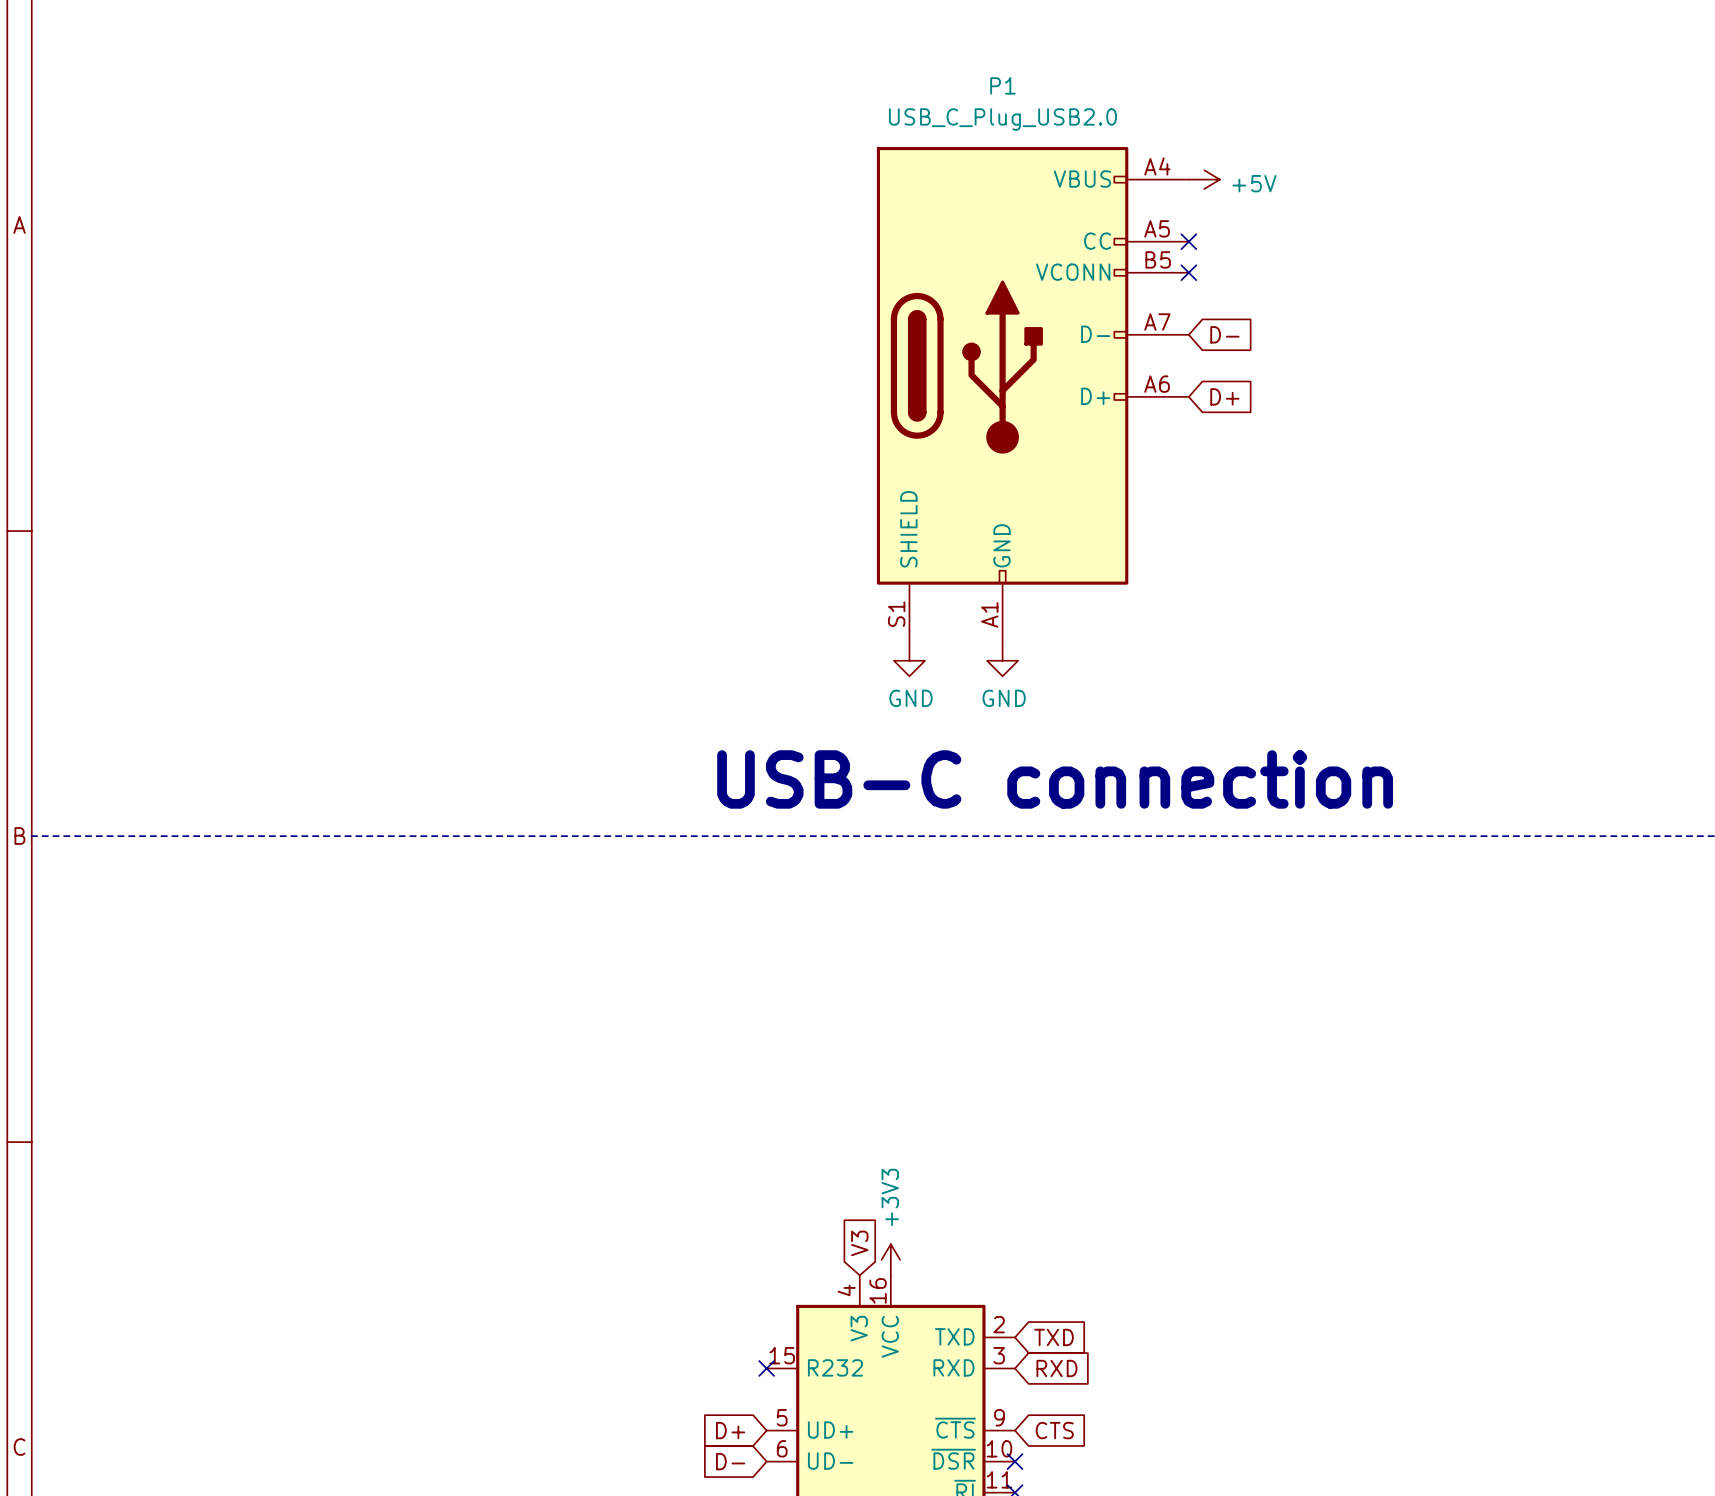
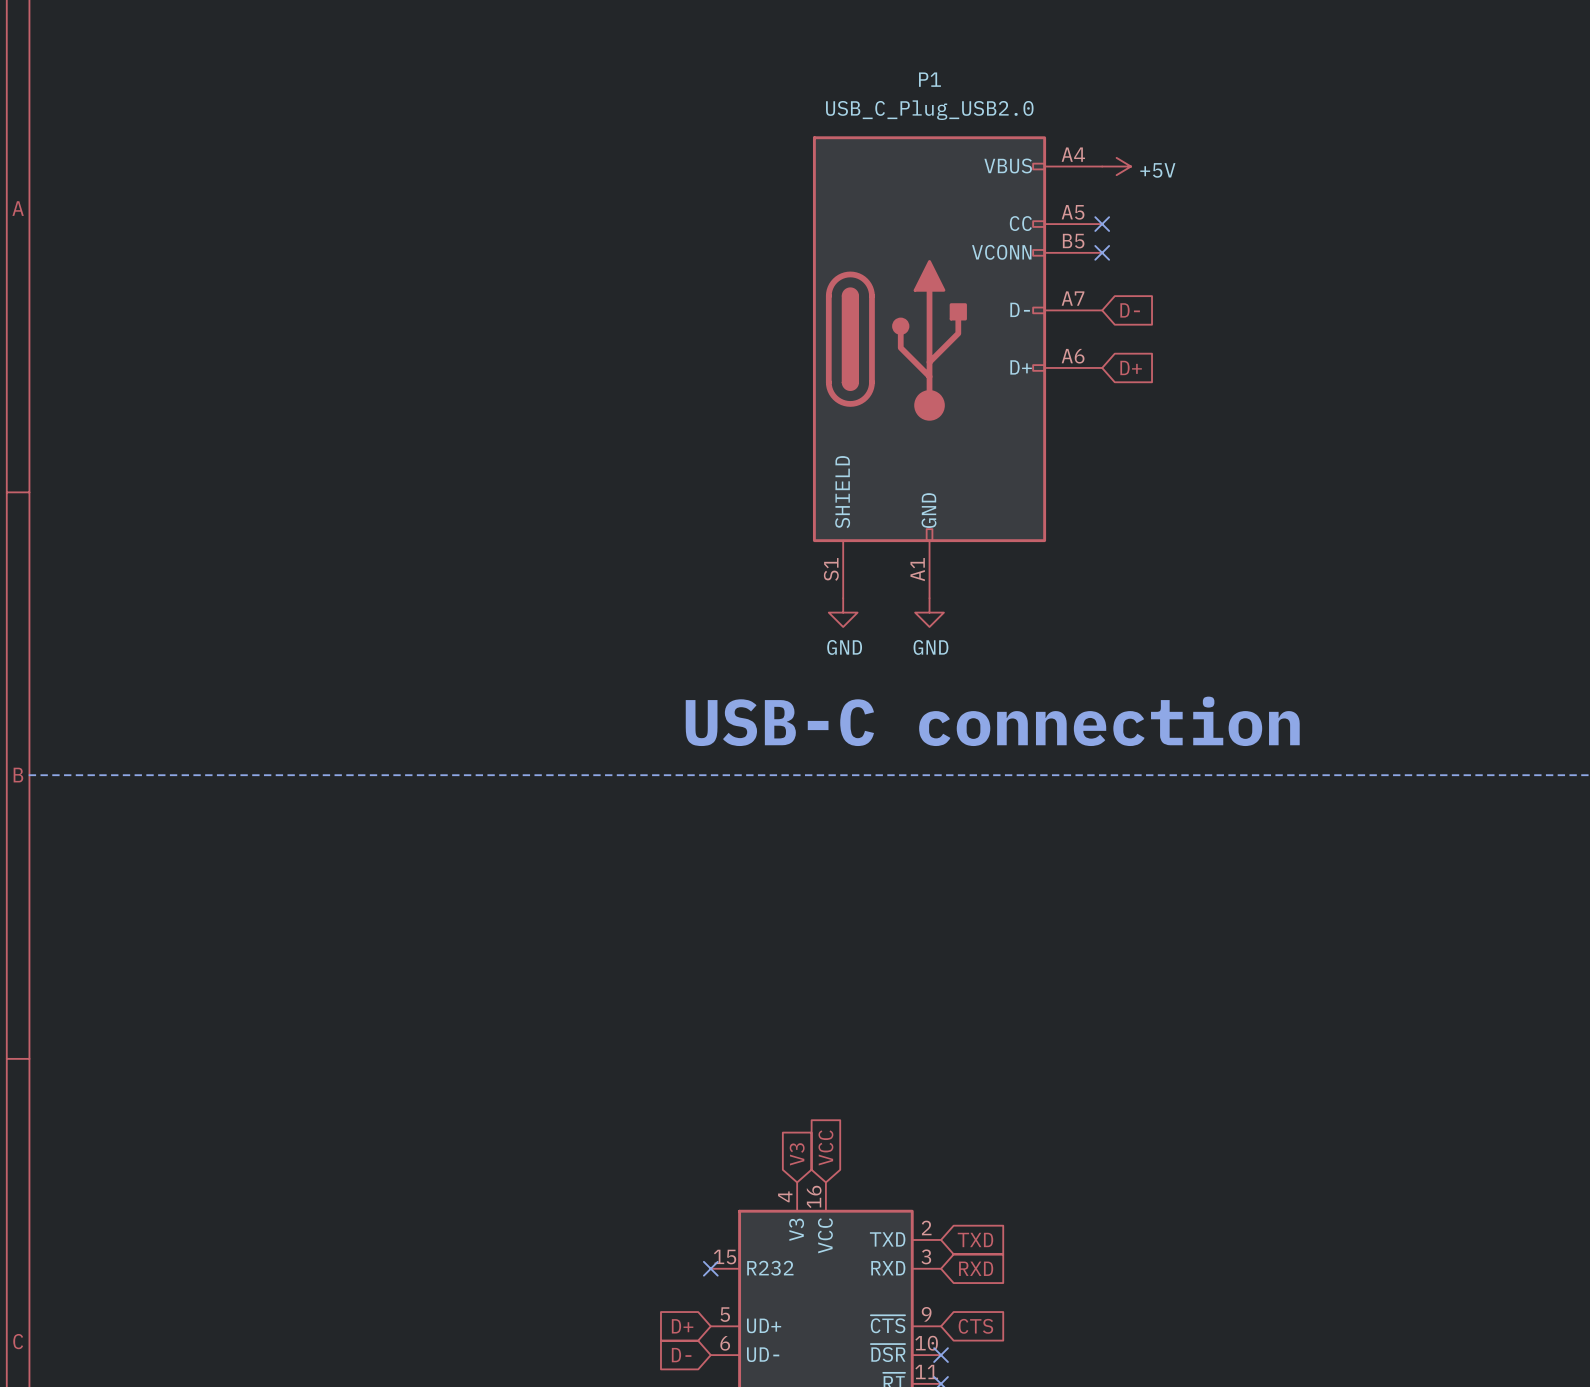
global label: none -> VCC (825, 1147)
power symbol: +3V3 (890, 1259) -> none

